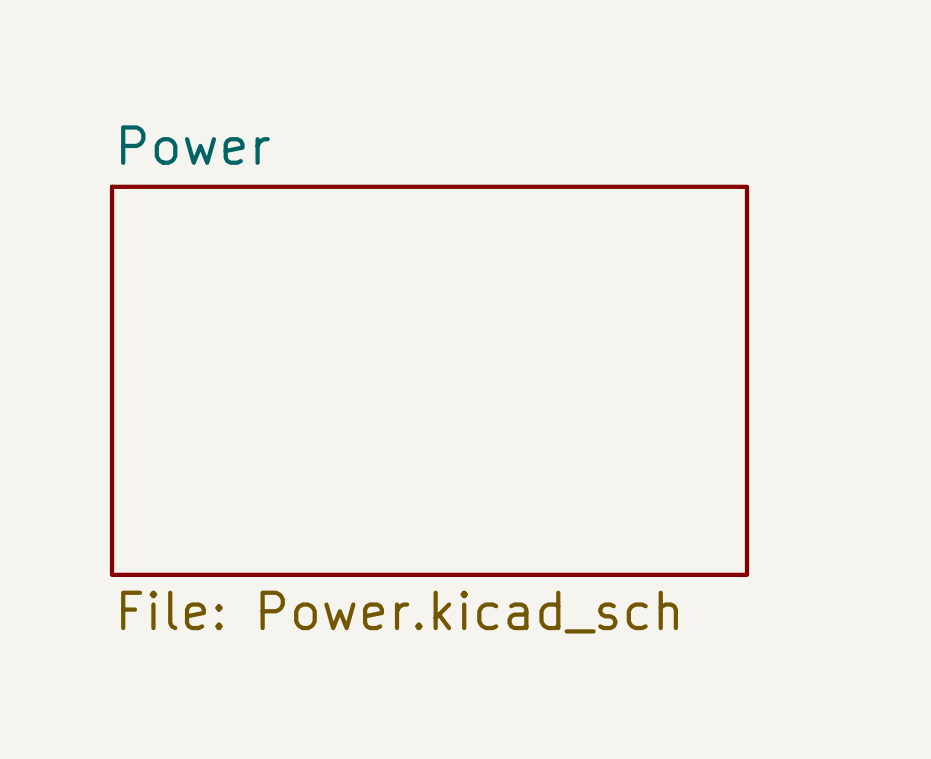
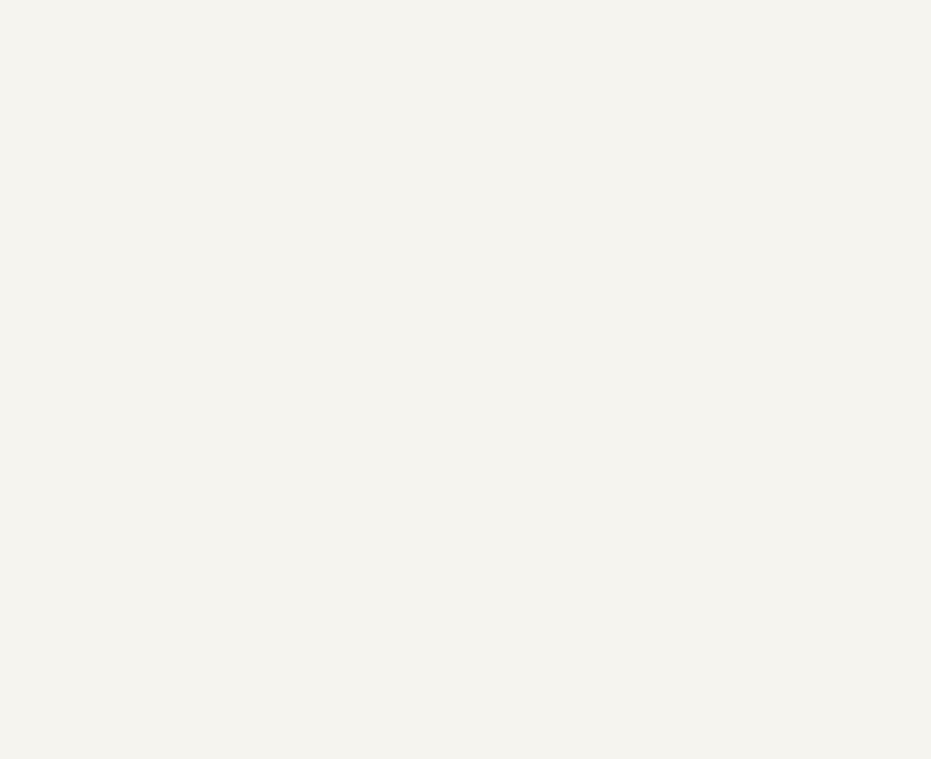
sheet Power: File: Power.kicad_sch (429, 380) -> none

